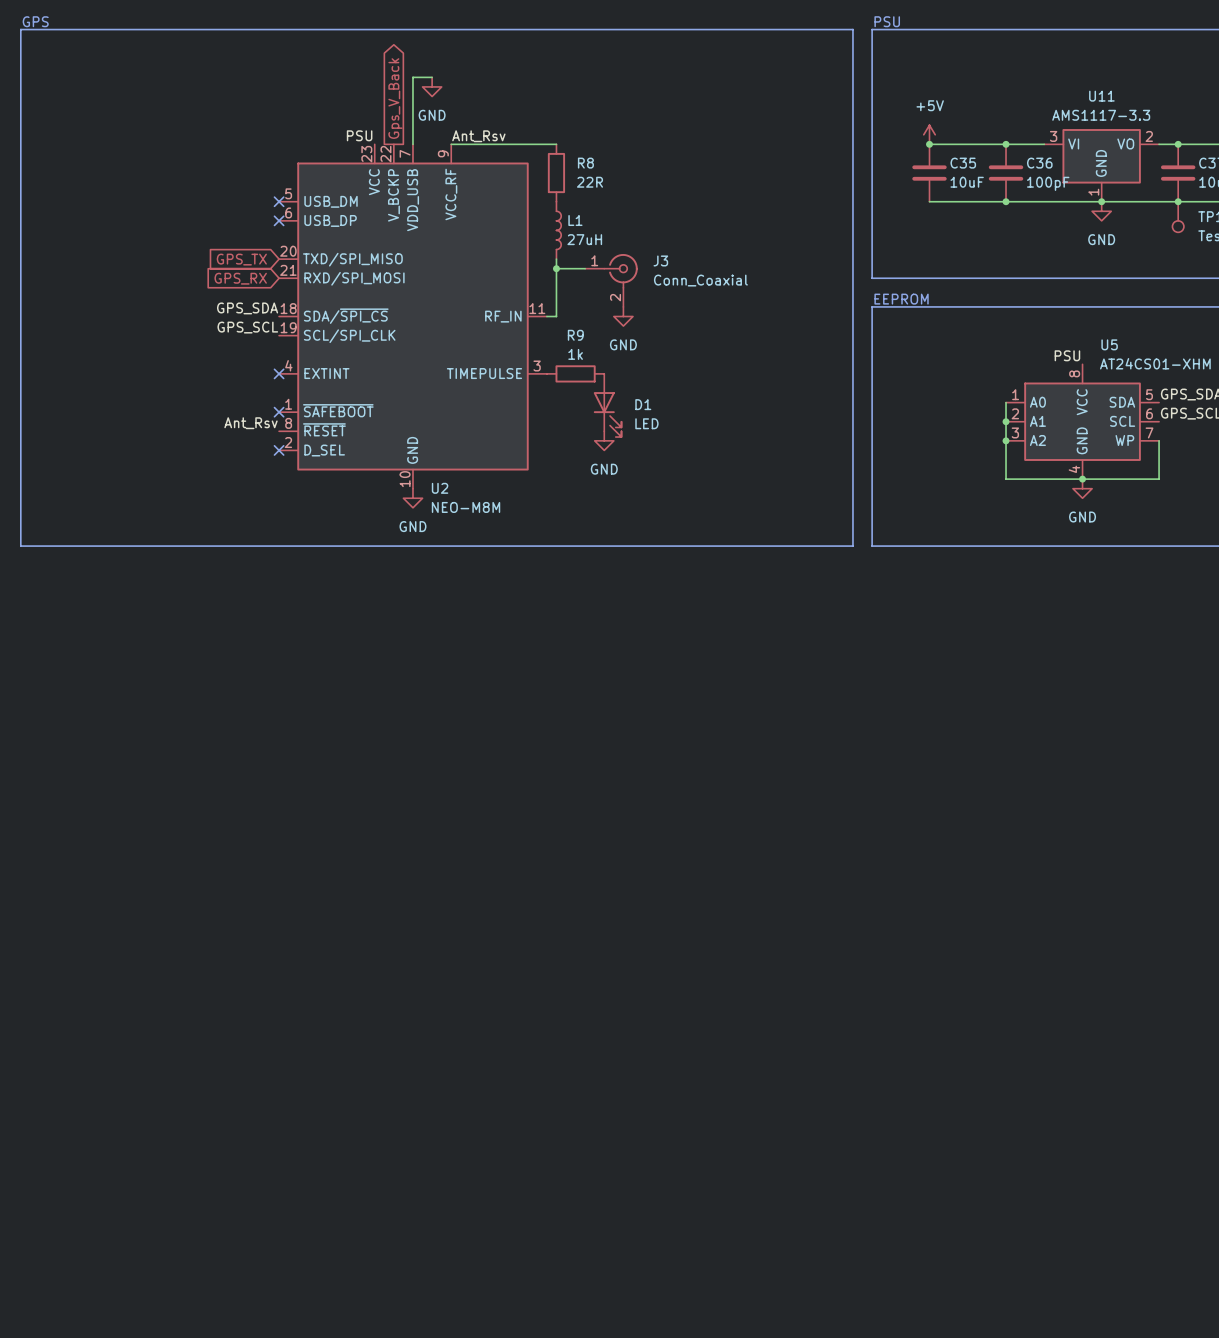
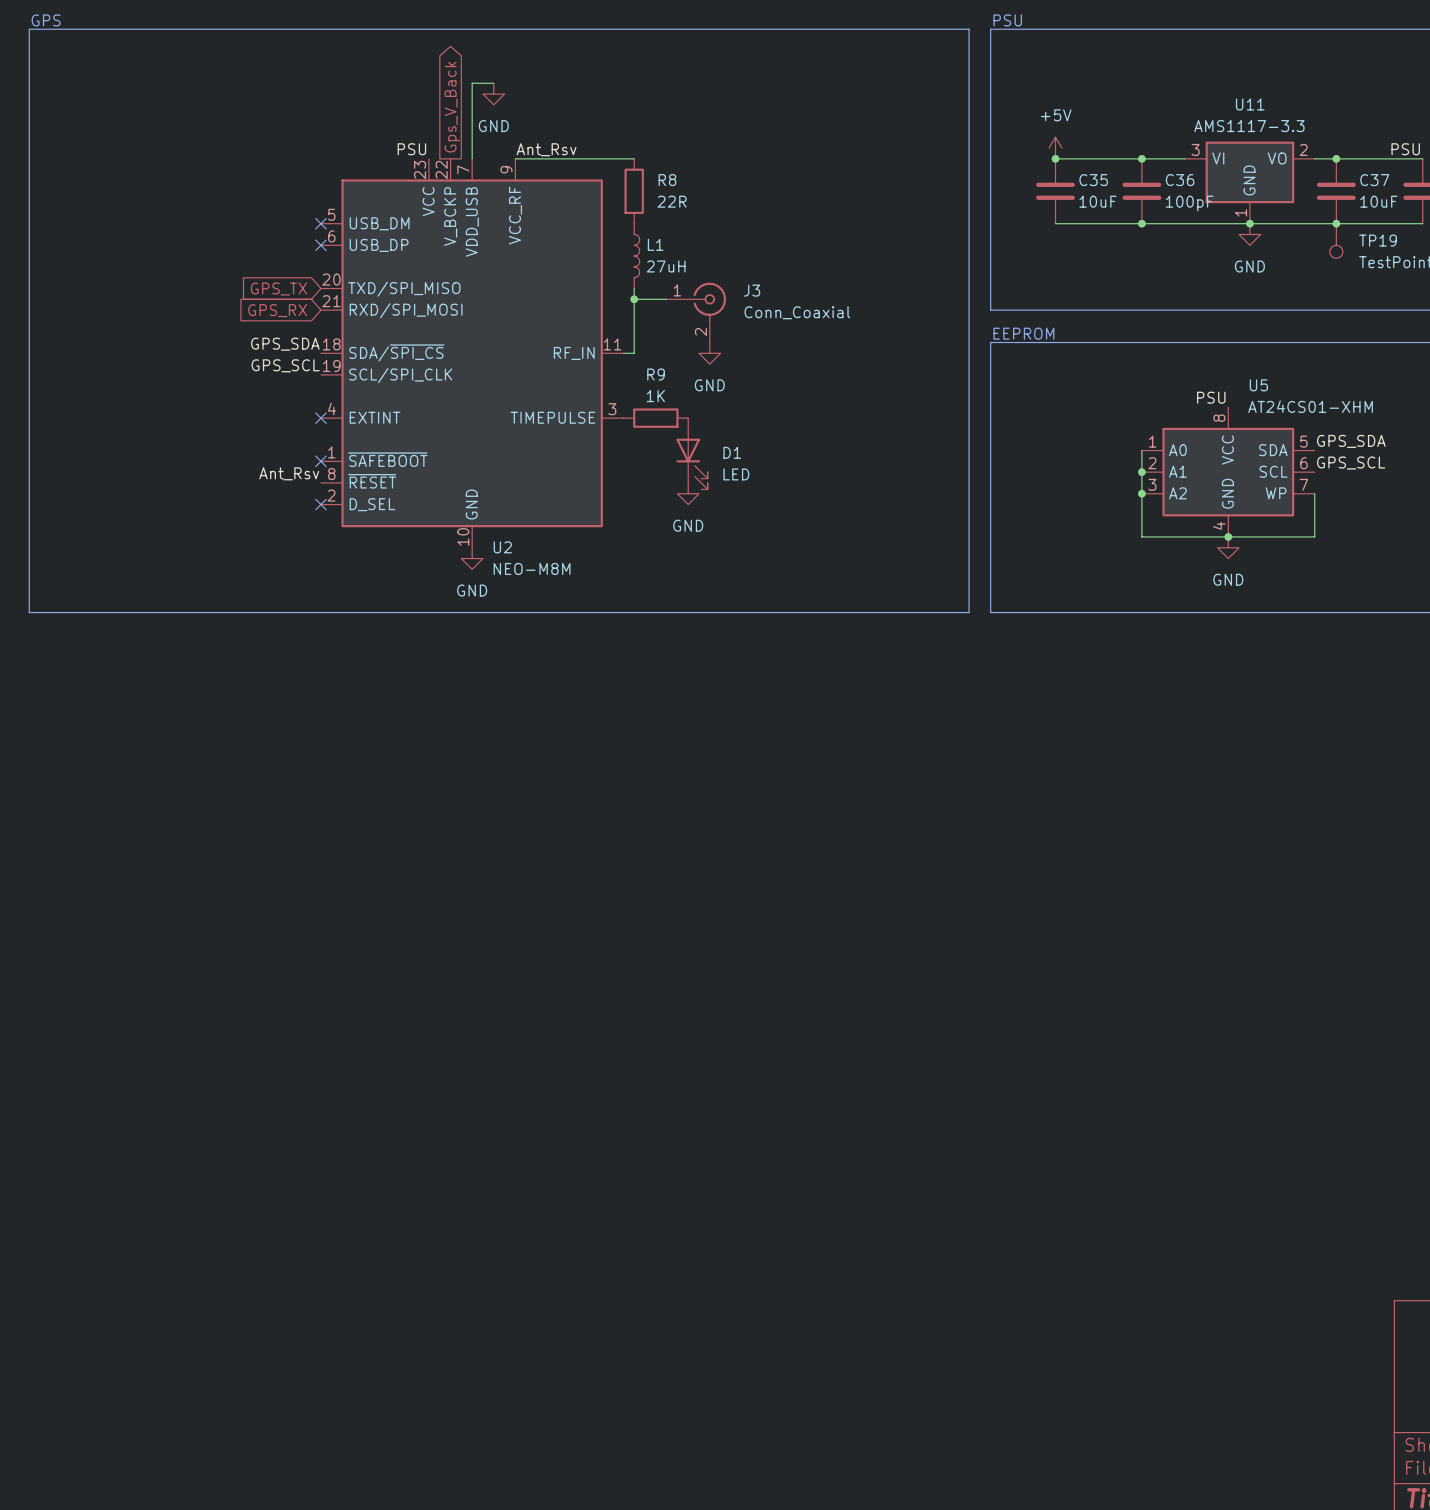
R9 value: 1k (575, 354) -> 1K (655, 396)

